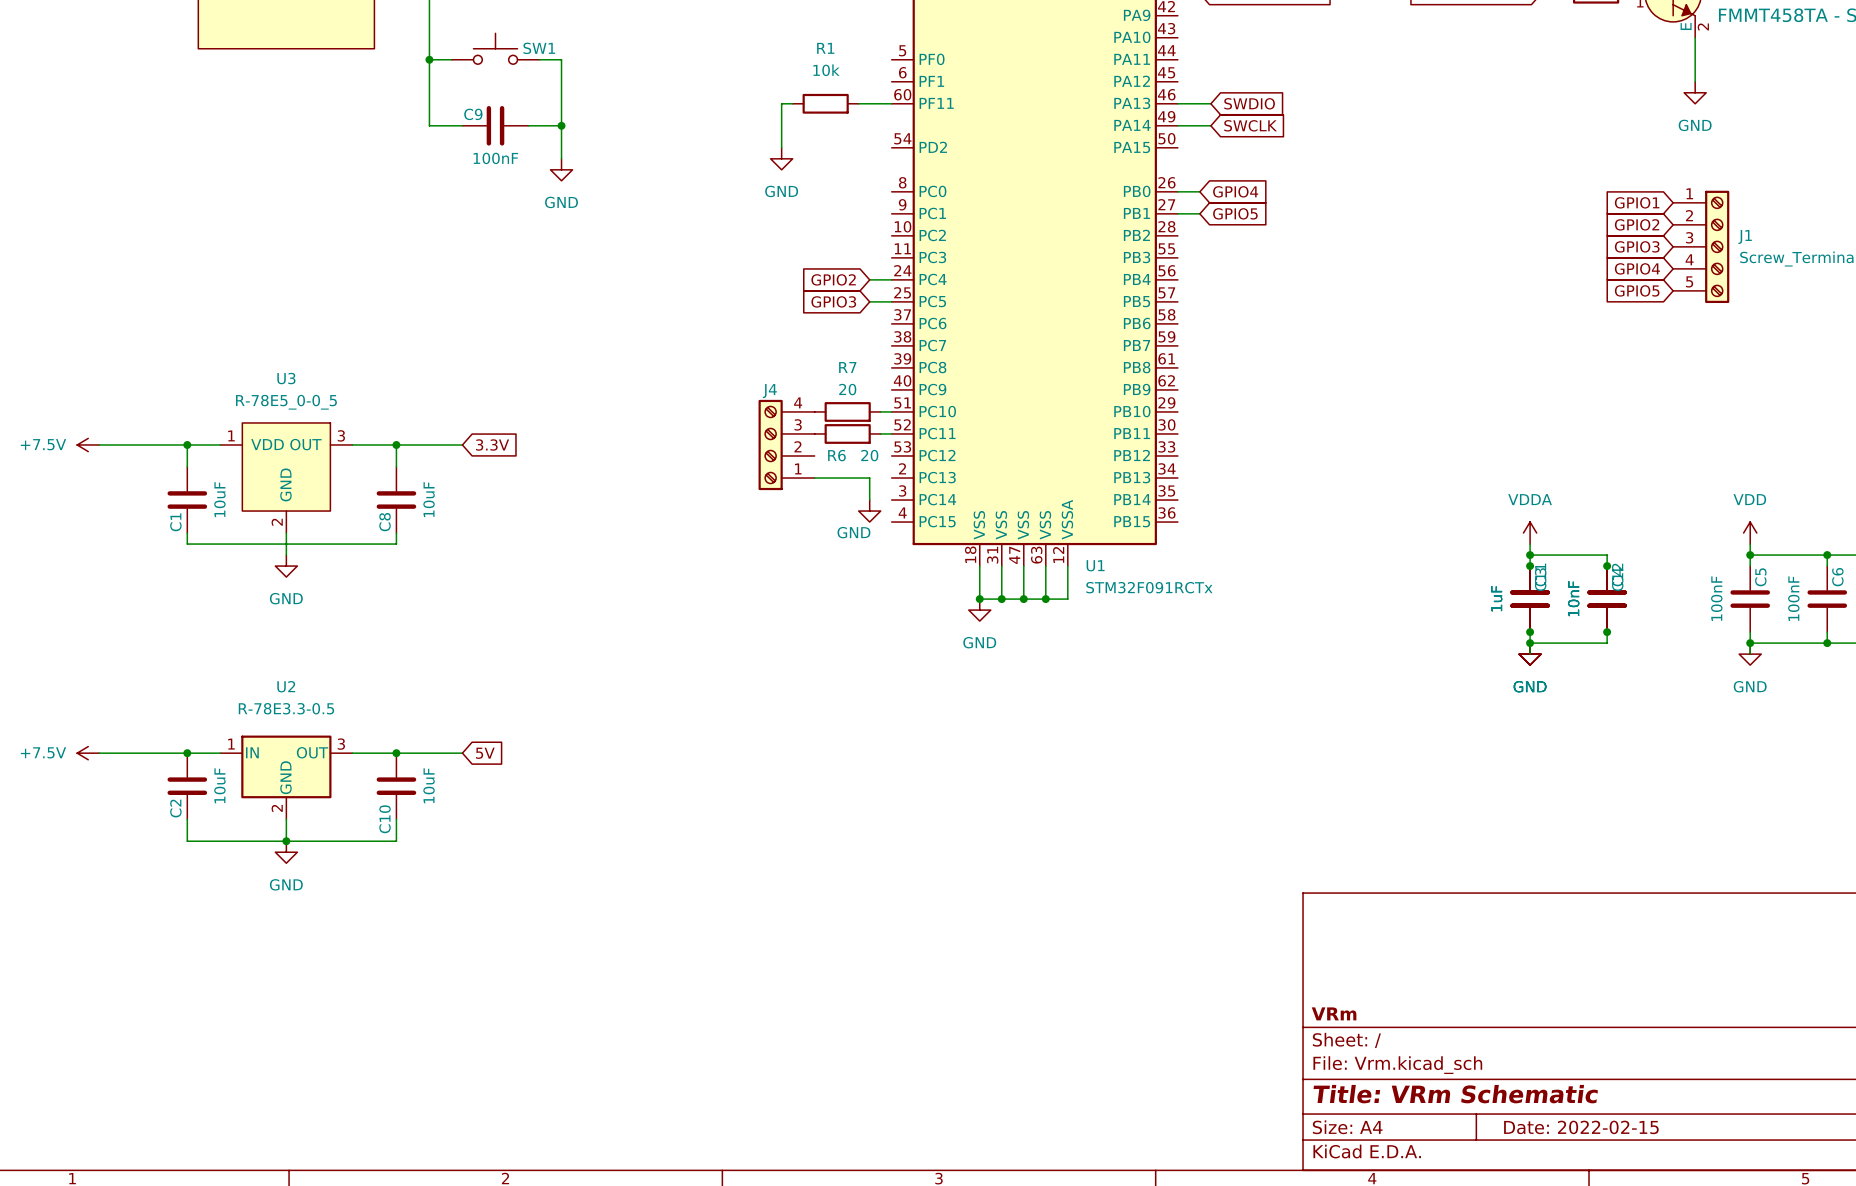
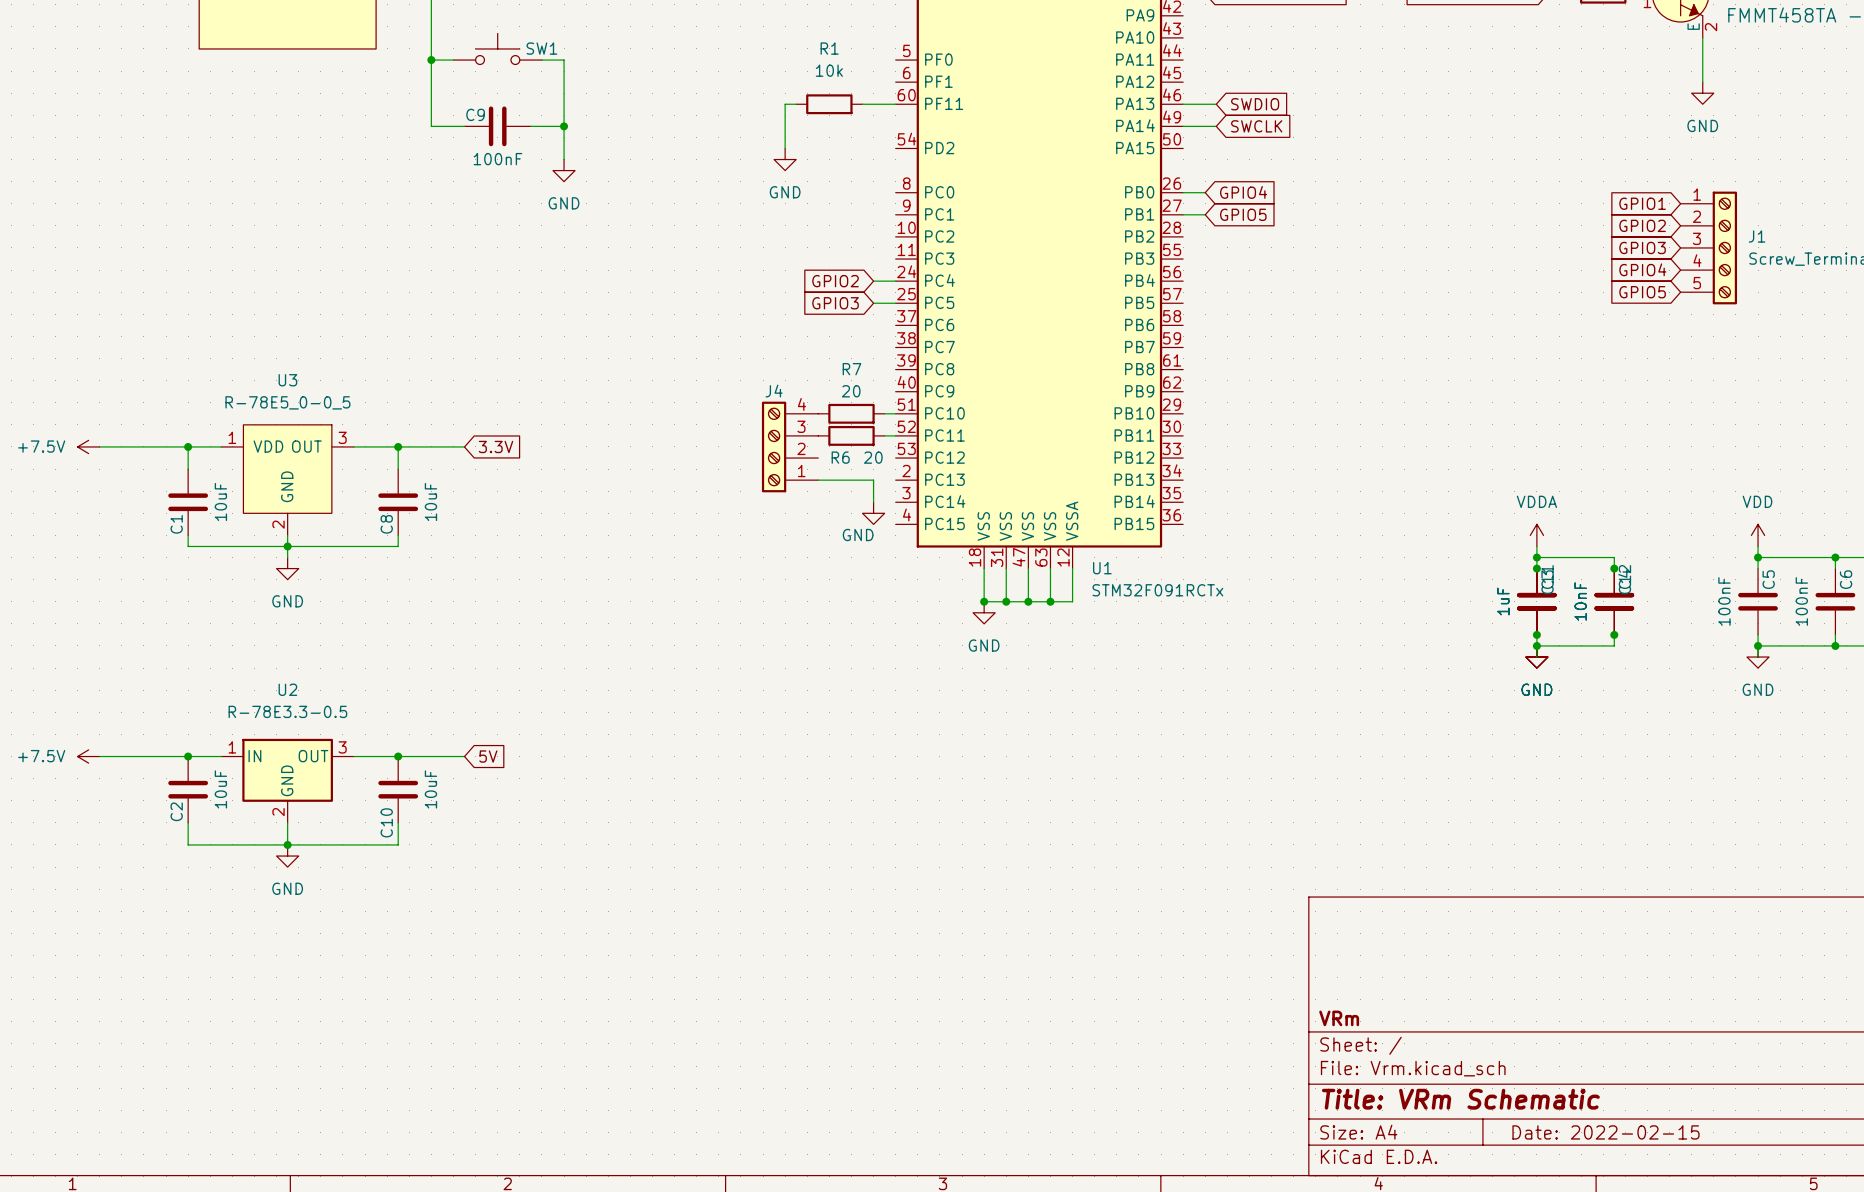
junction: none -> (287, 546)

